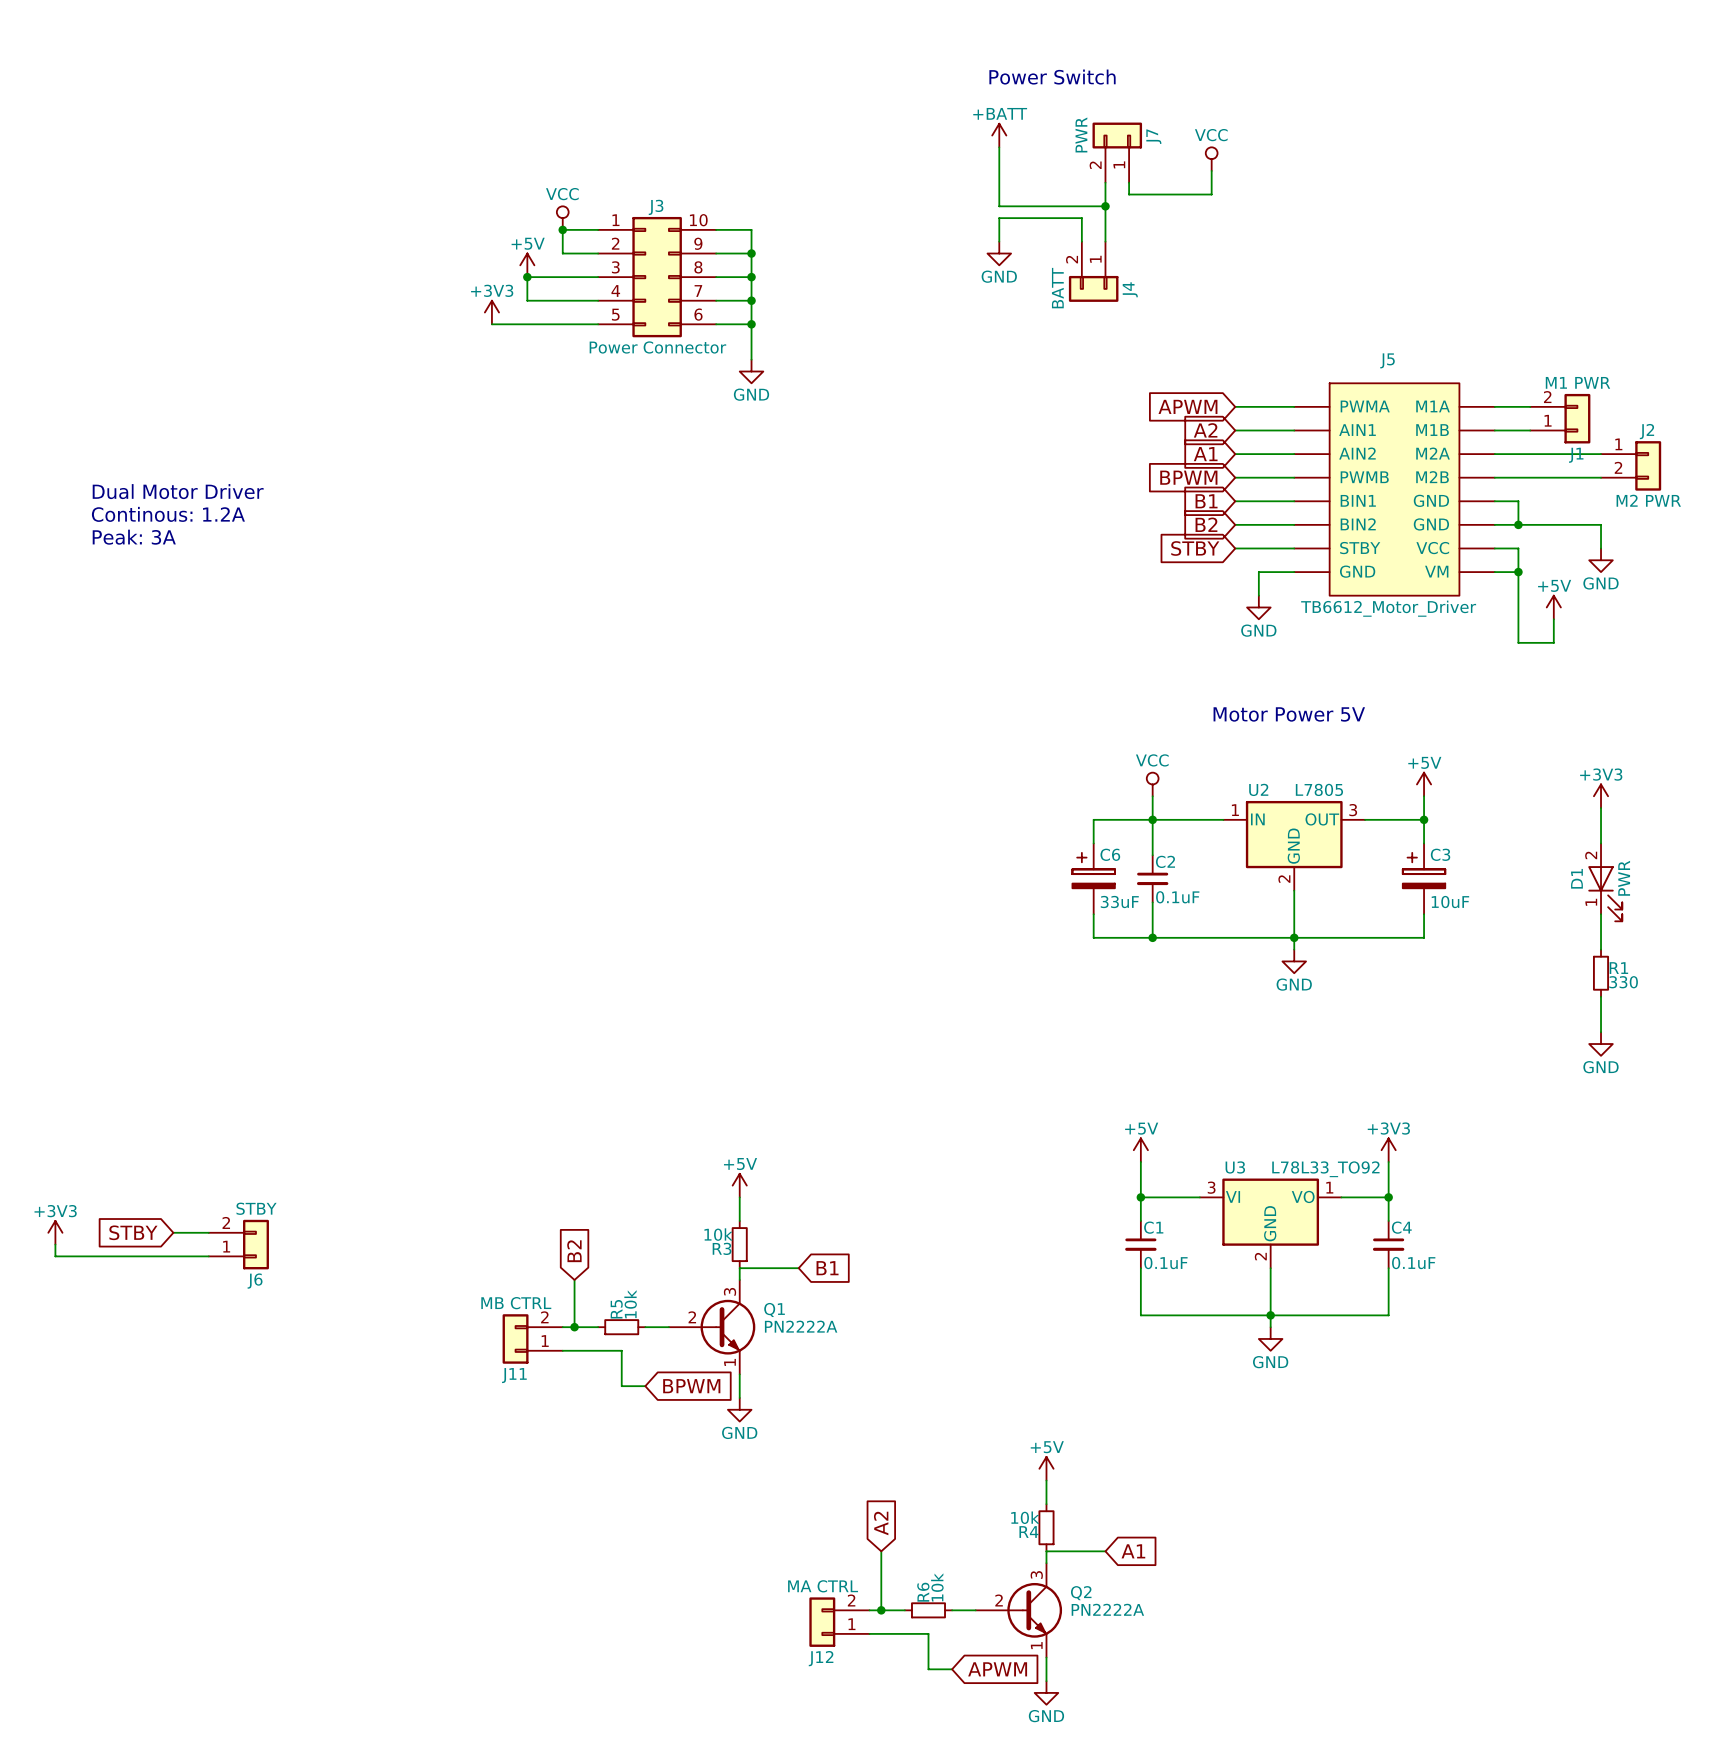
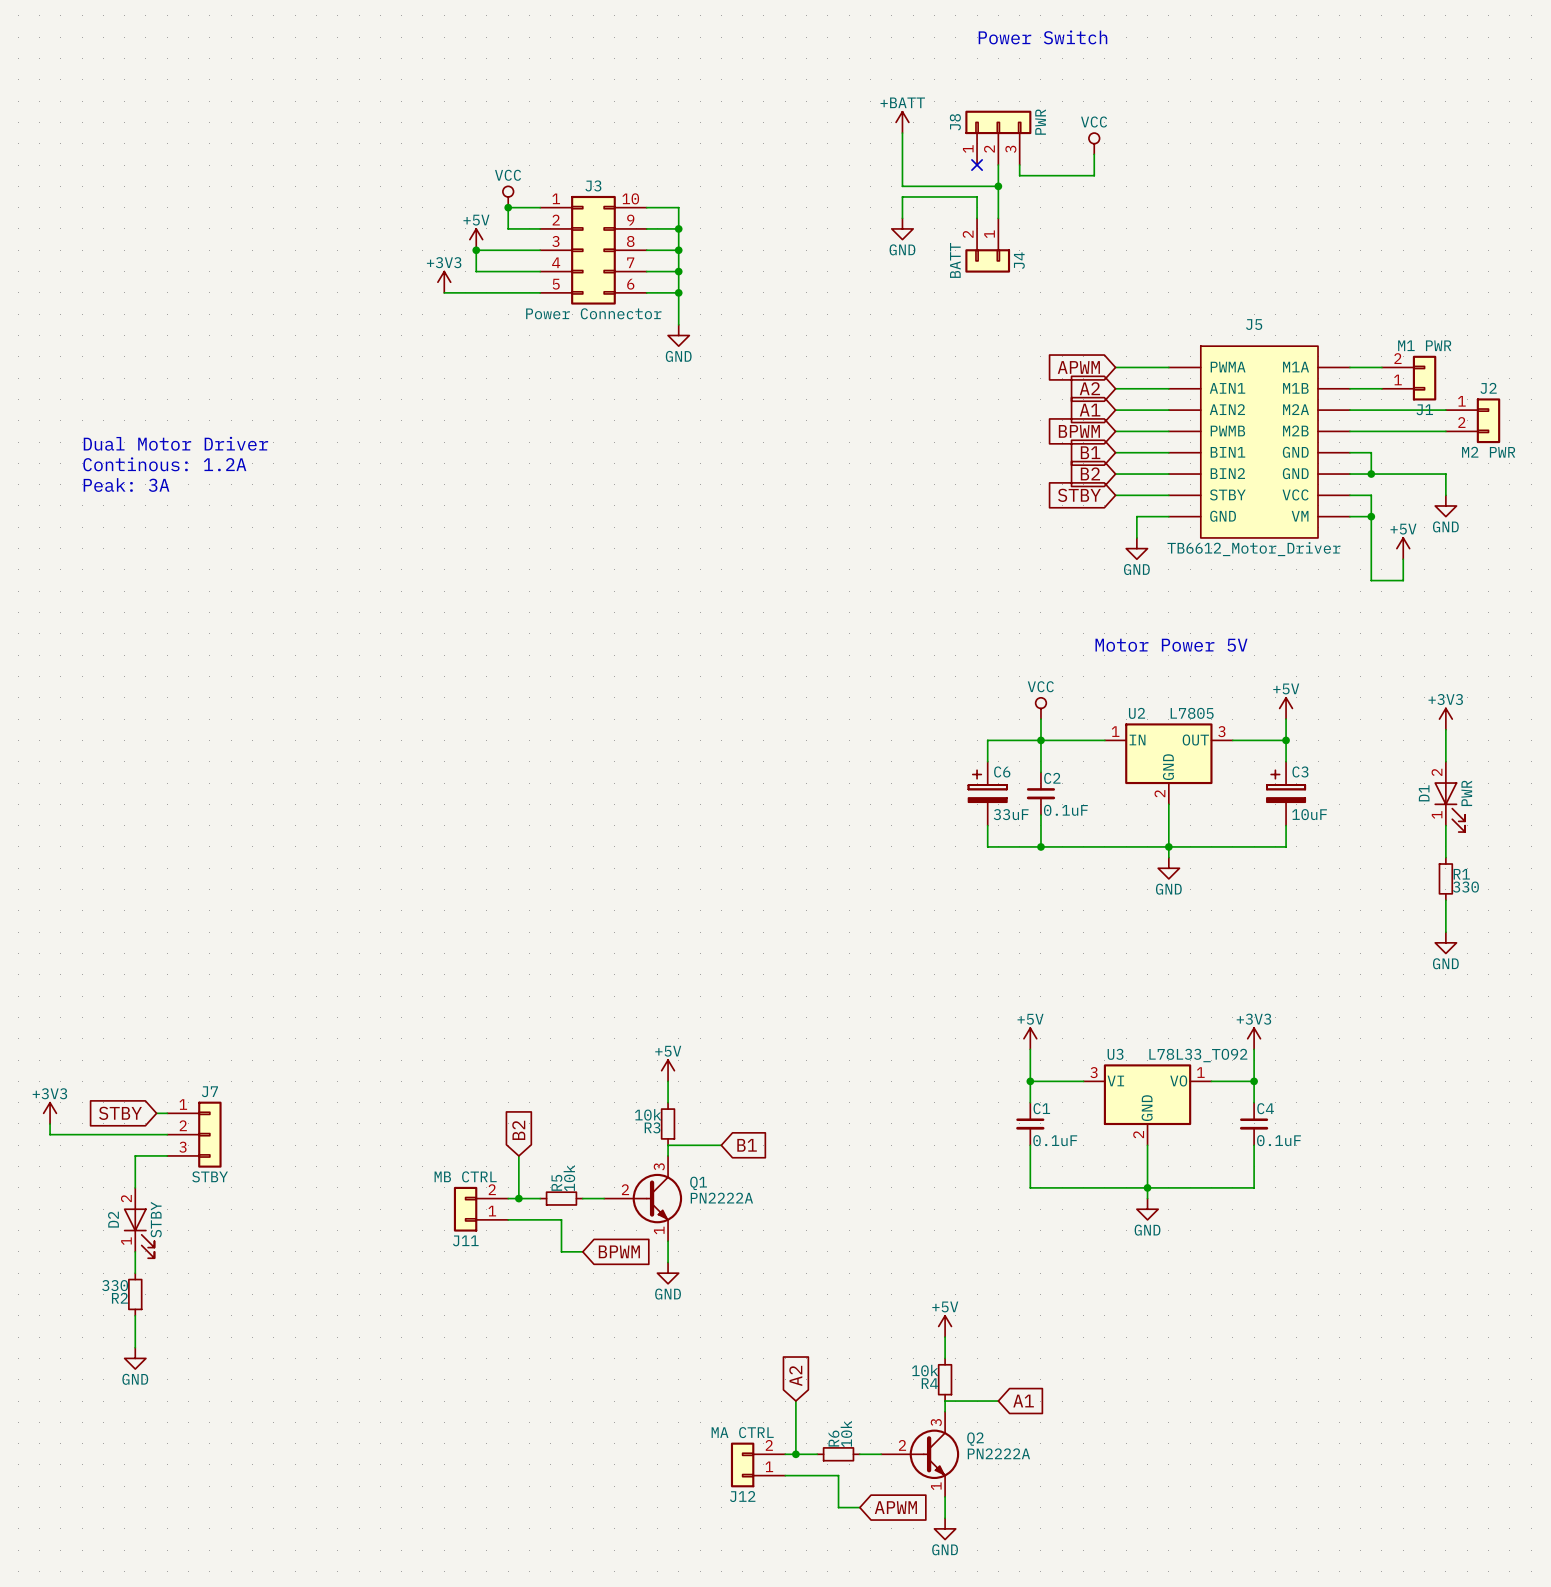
text position: Power Switch (1052, 77) -> Power Switch (1042, 37)
J7 symbol: [1092, 122, 1143, 183] -> [167, 1101, 222, 1168]
J7 value: PWR (1081, 134) -> STBY (210, 1176)
J7 name position: J7 (1153, 136) -> J7 (209, 1091)
J8: none -> PWR (998, 137)
no-connect mark: none -> (977, 165)
J6: STBY (238, 1244) -> none
wire: none -> (167, 1155) (135, 1155) (135, 1187)
D2: none -> STBY (139, 1223)
wire: none -> (135, 1251) (135, 1273)
R2: none -> 330 (135, 1294)
wire: none -> (135, 1315) (135, 1347)
power symbol: none -> GND (135, 1358)

